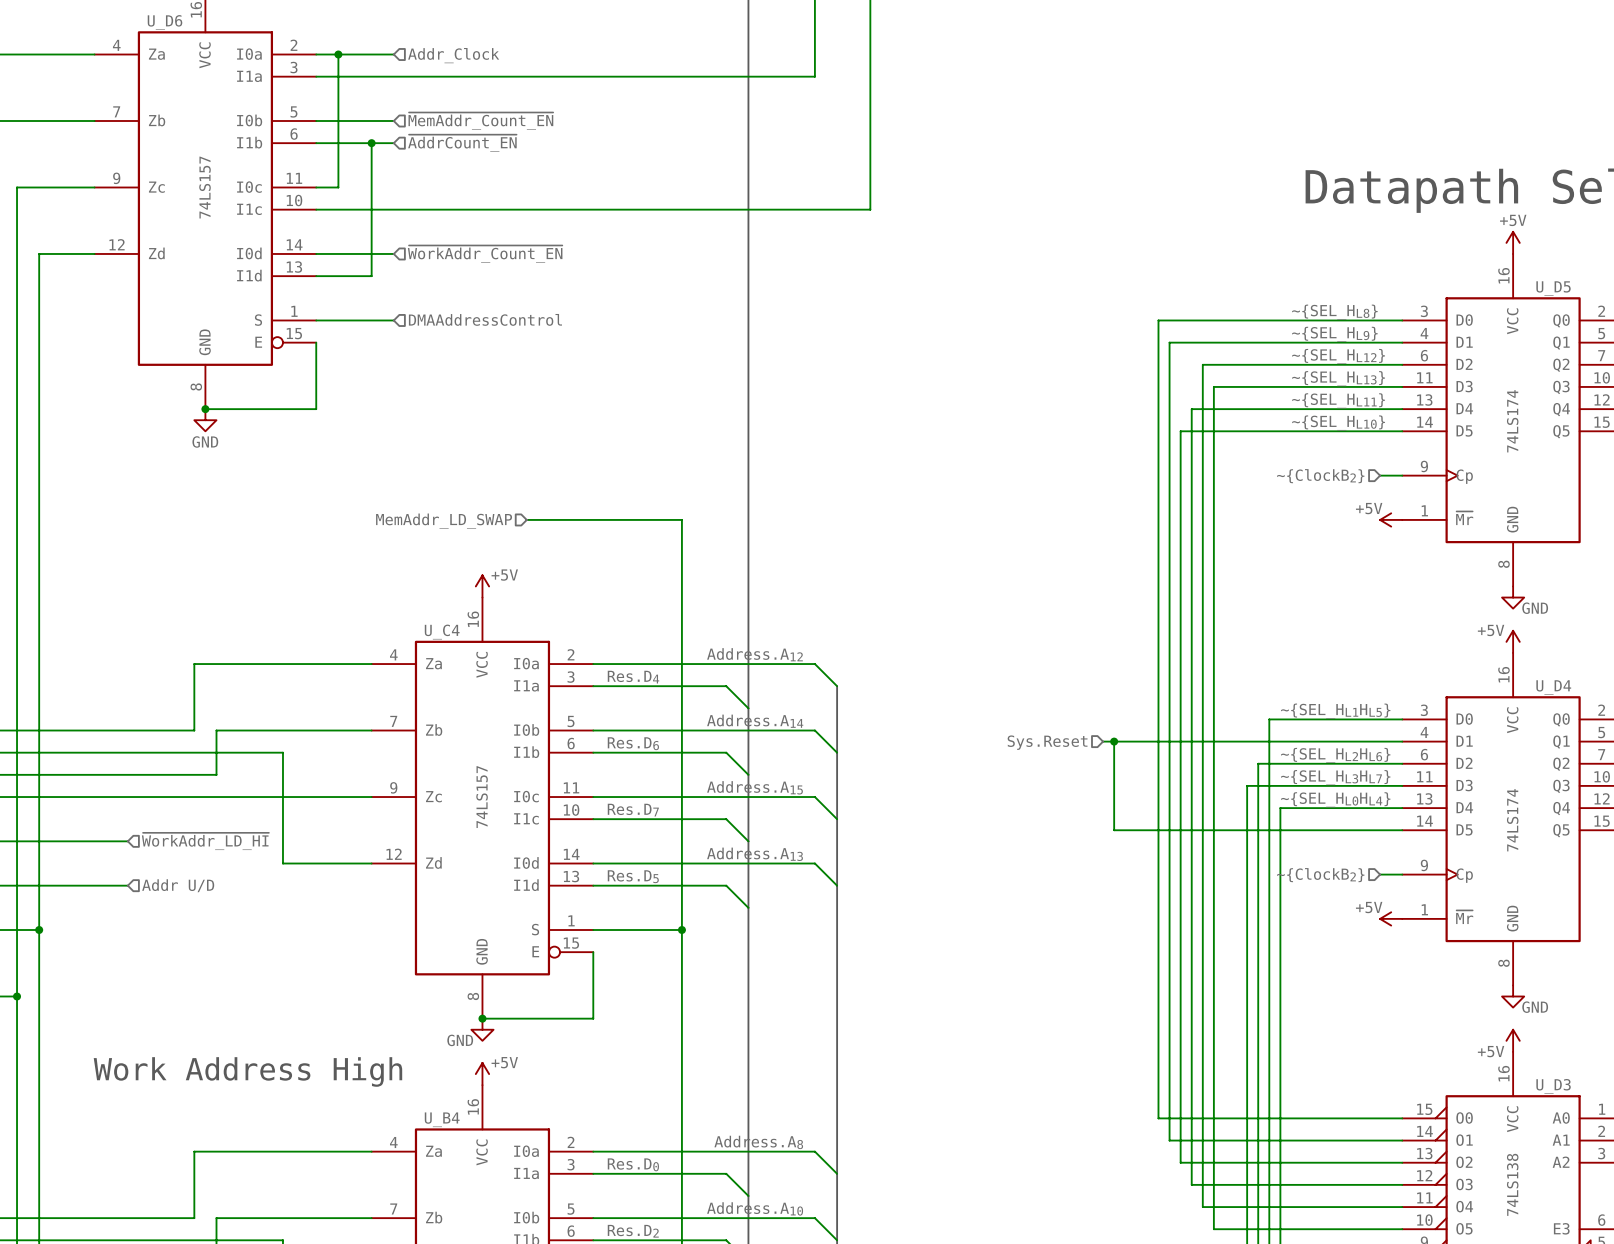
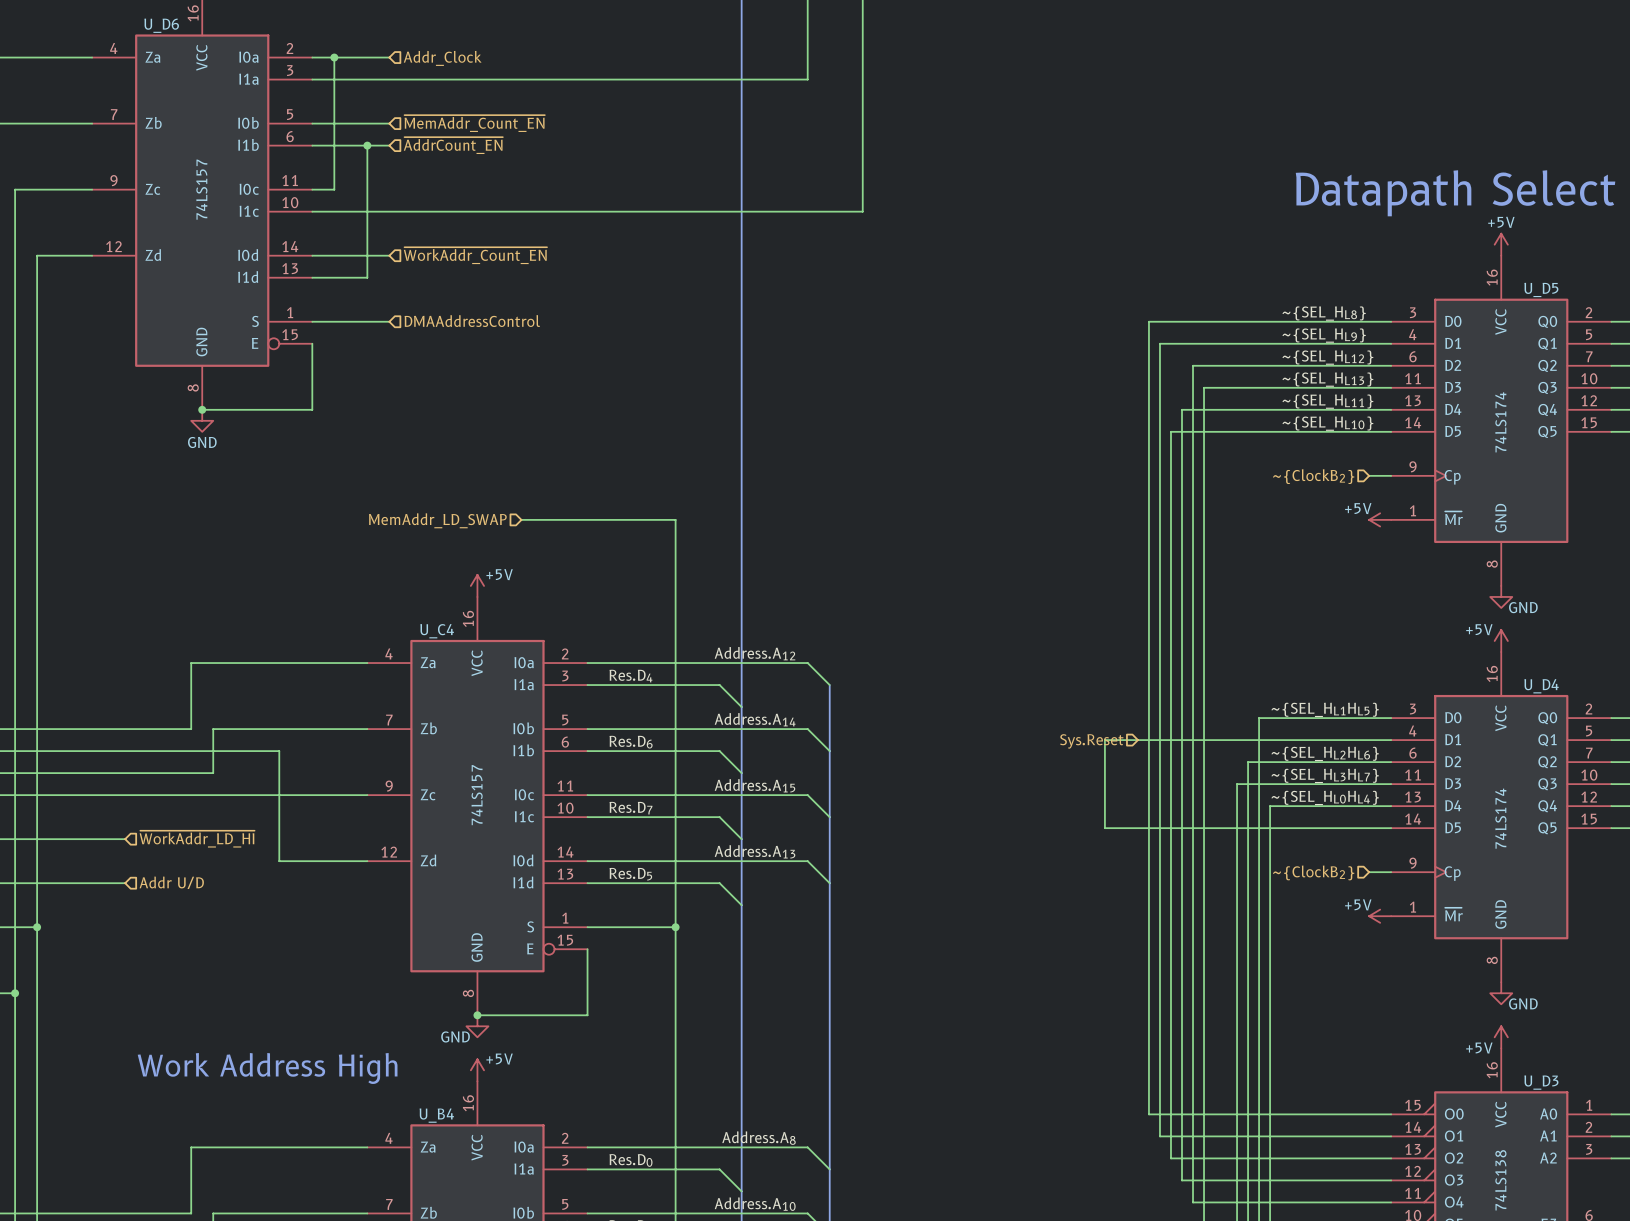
junction: (1114, 741) -> none
hierarchical label position: Sys.Reset (1047, 742) -> Sys.Reset (1091, 741)

